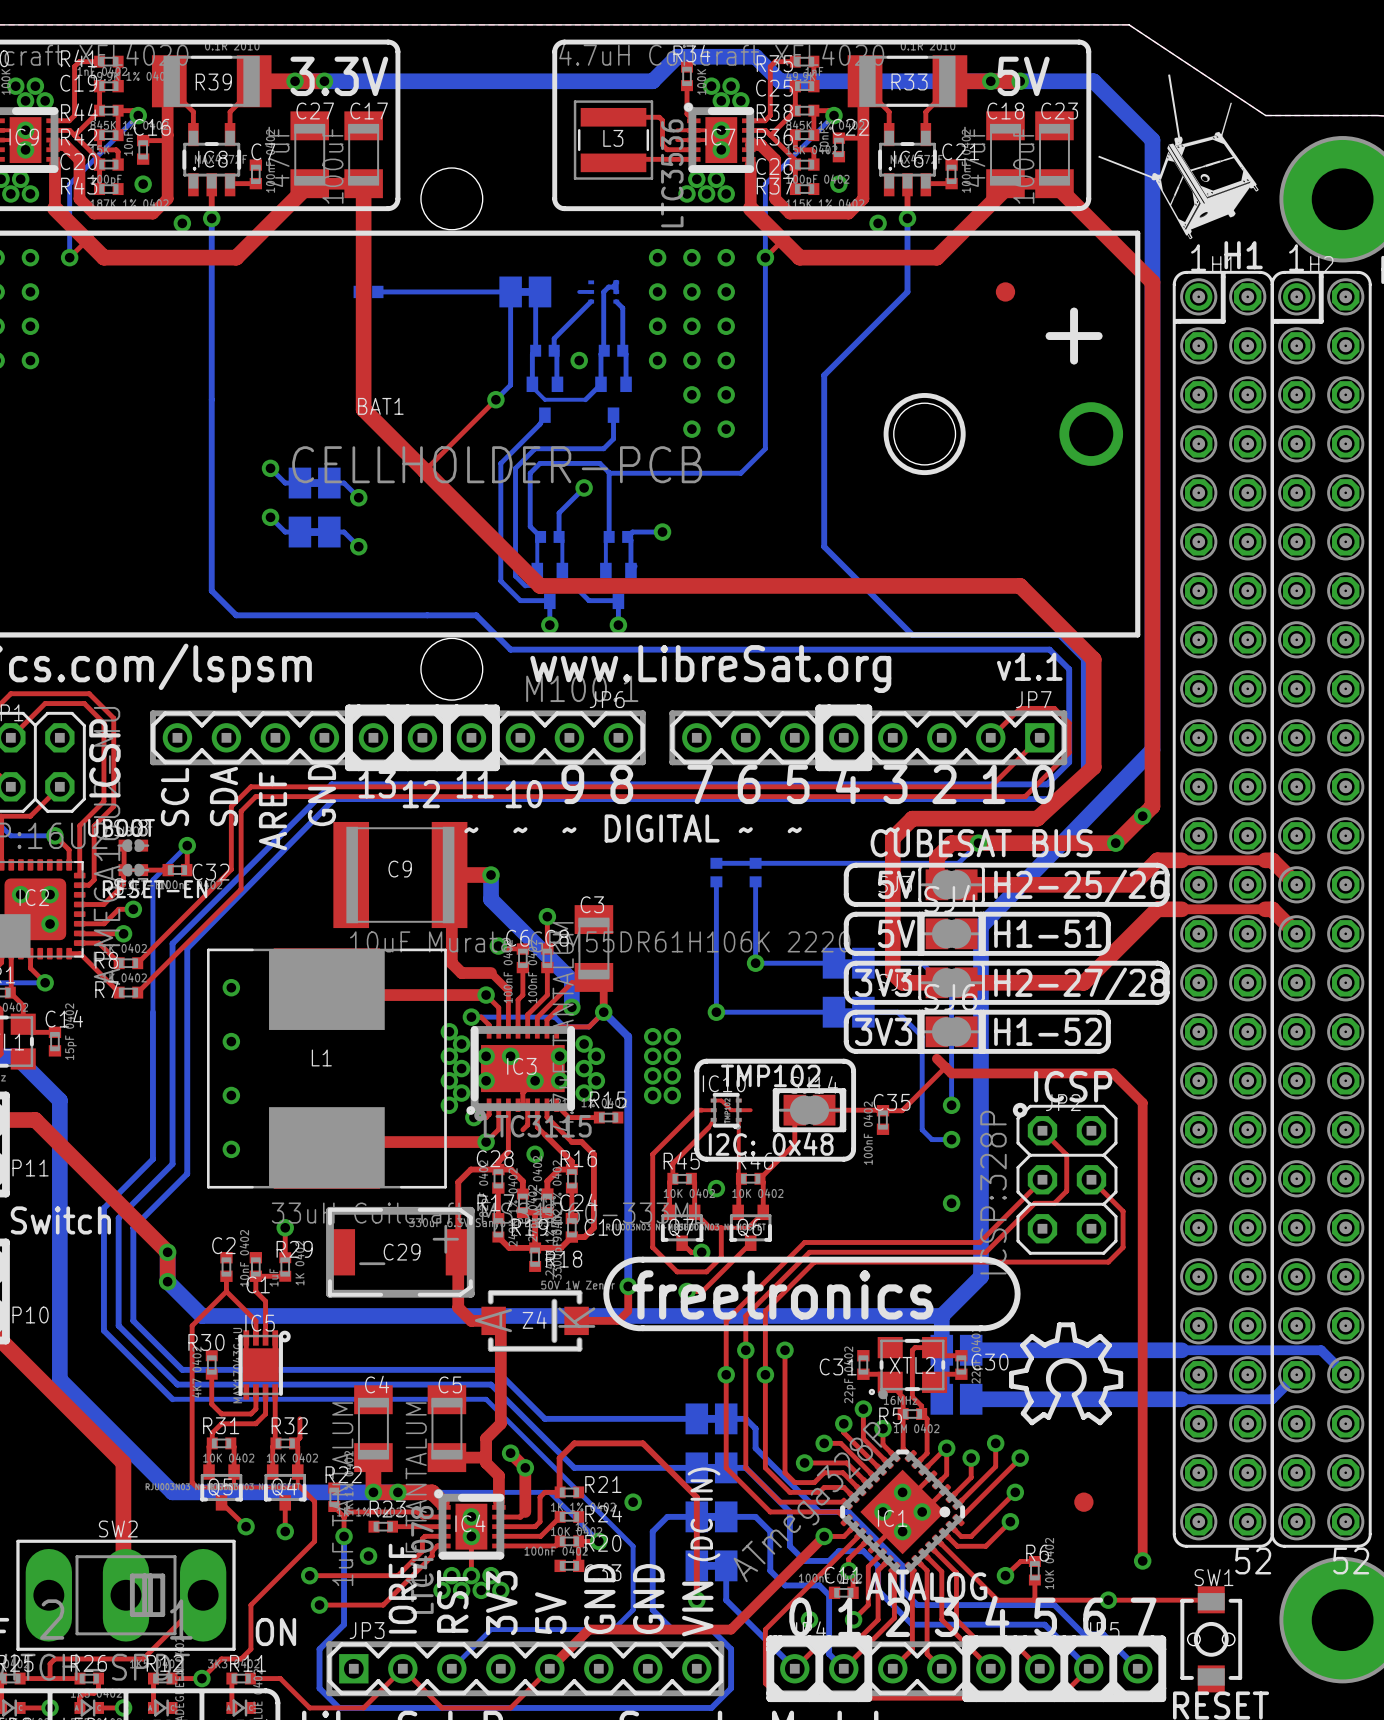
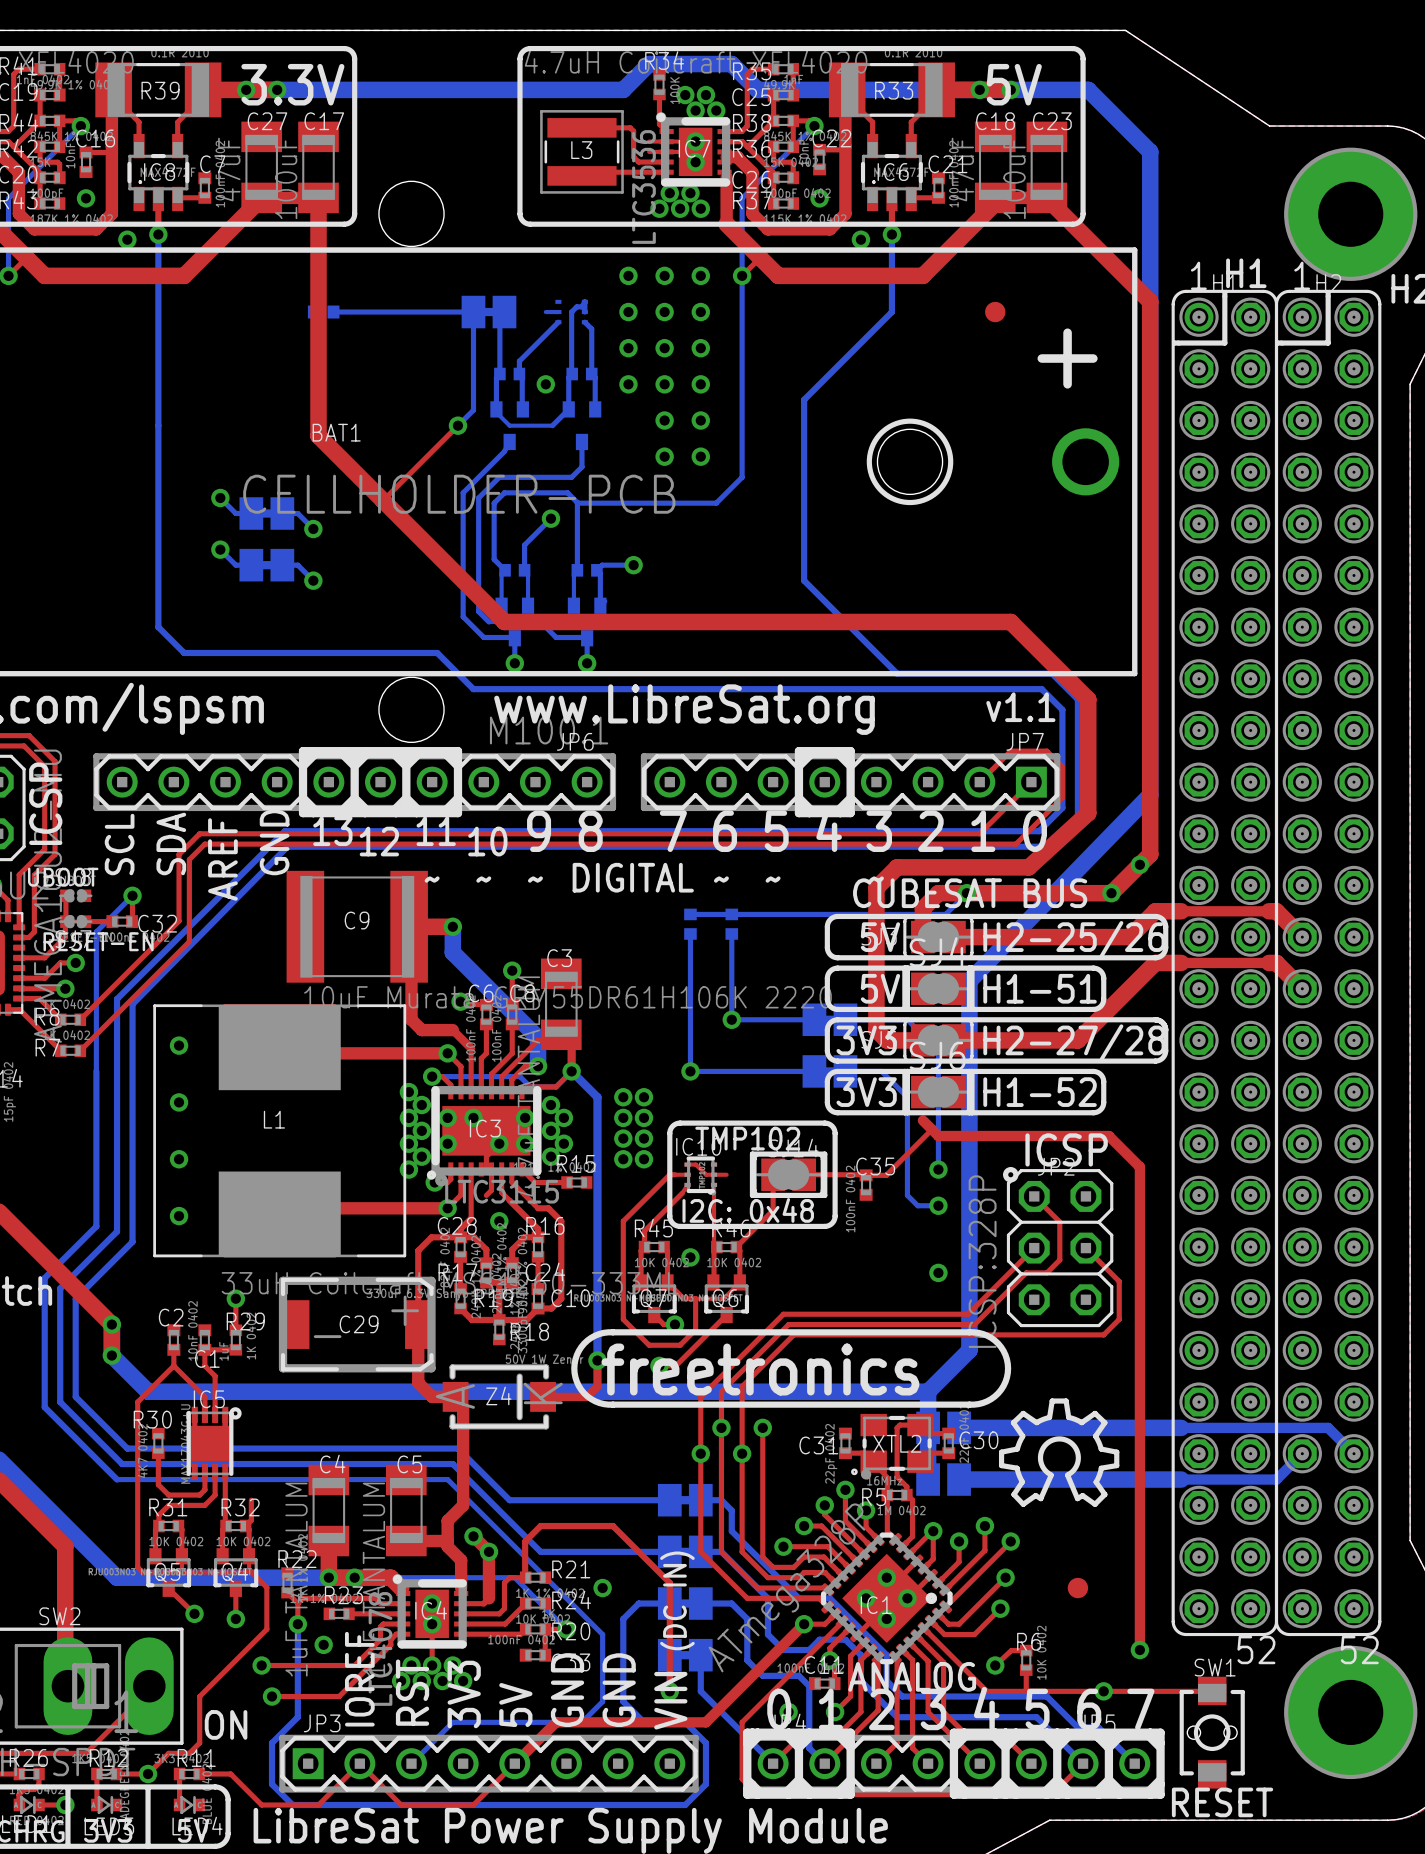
drawing: [1098, 74, 1259, 240] -> none

